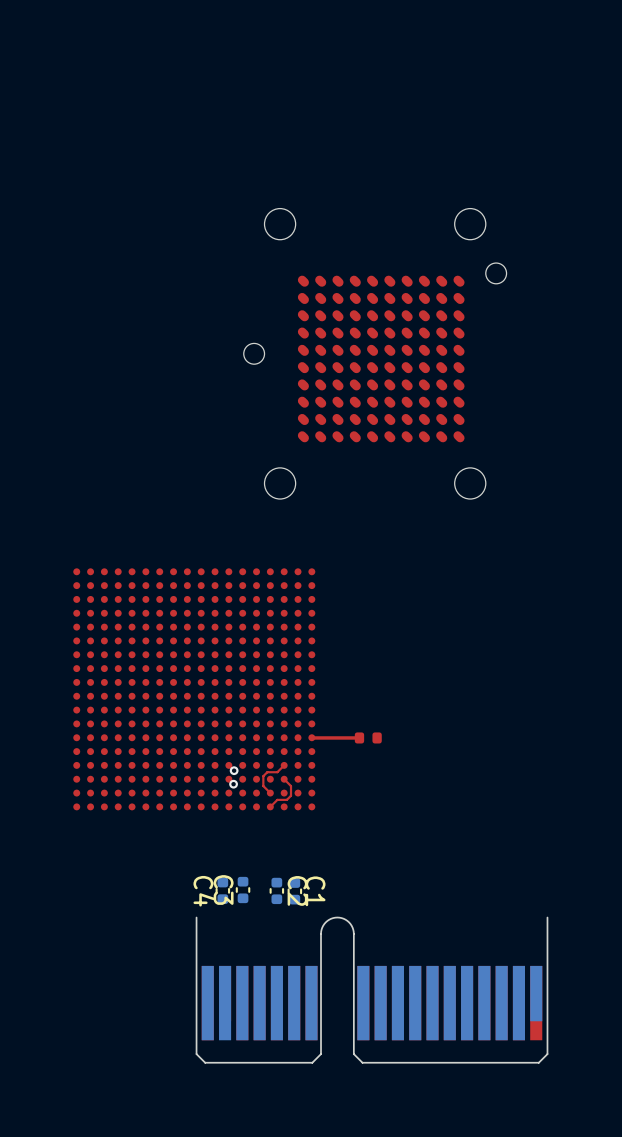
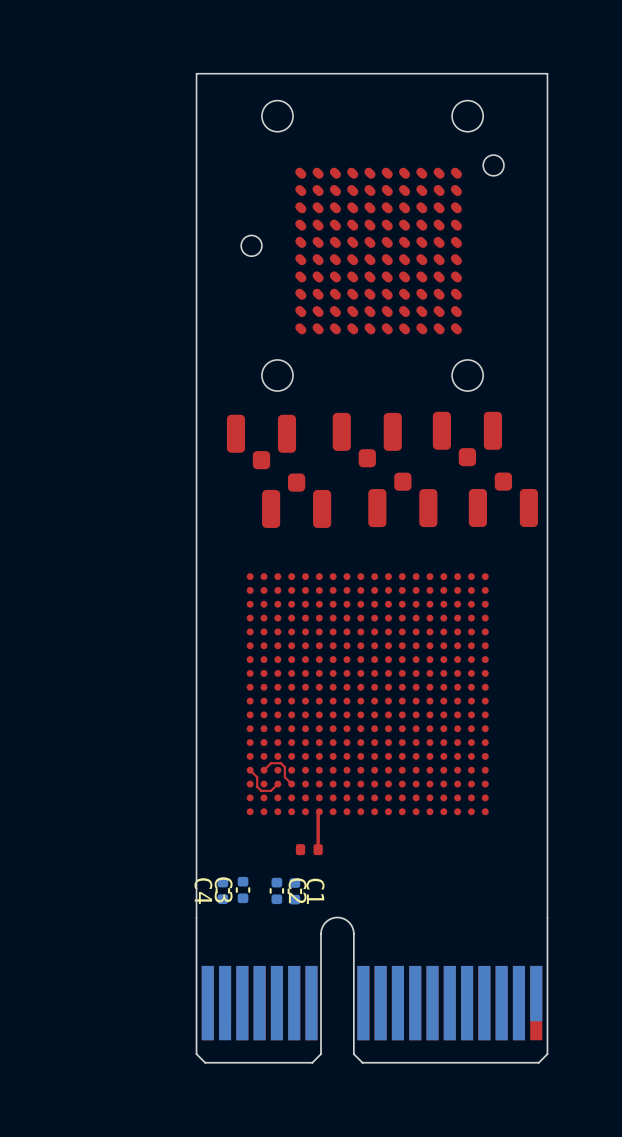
part position: (375, 353) -> (372, 245)
part: none -> (467, 439)
part: none -> (367, 440)
part: none -> (261, 441)
part: none -> (402, 499)
part: none -> (503, 499)
part: none -> (296, 500)
part position: (194, 689) -> (367, 694)
top track: (359, 737) (312, 737) -> none
part position: (368, 737) -> (309, 849)
top track: (284, 765) (277, 772) (267, 772) (263, 776) (263, 786) (270, 793) -> none
via: (234, 770) -> none
top track: none -> (250, 770) (257, 777) (257, 786) (261, 790) (271, 790) (277, 784)
top track: none -> (264, 770) (271, 763) (280, 763) (284, 767) (284, 777) (291, 784)
top track: (284, 779) (291, 786) (291, 795) (286, 799) (277, 799) (270, 806) -> none
via: (233, 784) -> none
top track: none -> (319, 811) (318, 849)
board edge: none -> (547, 917) (547, 73) (196, 73) (196, 917)

